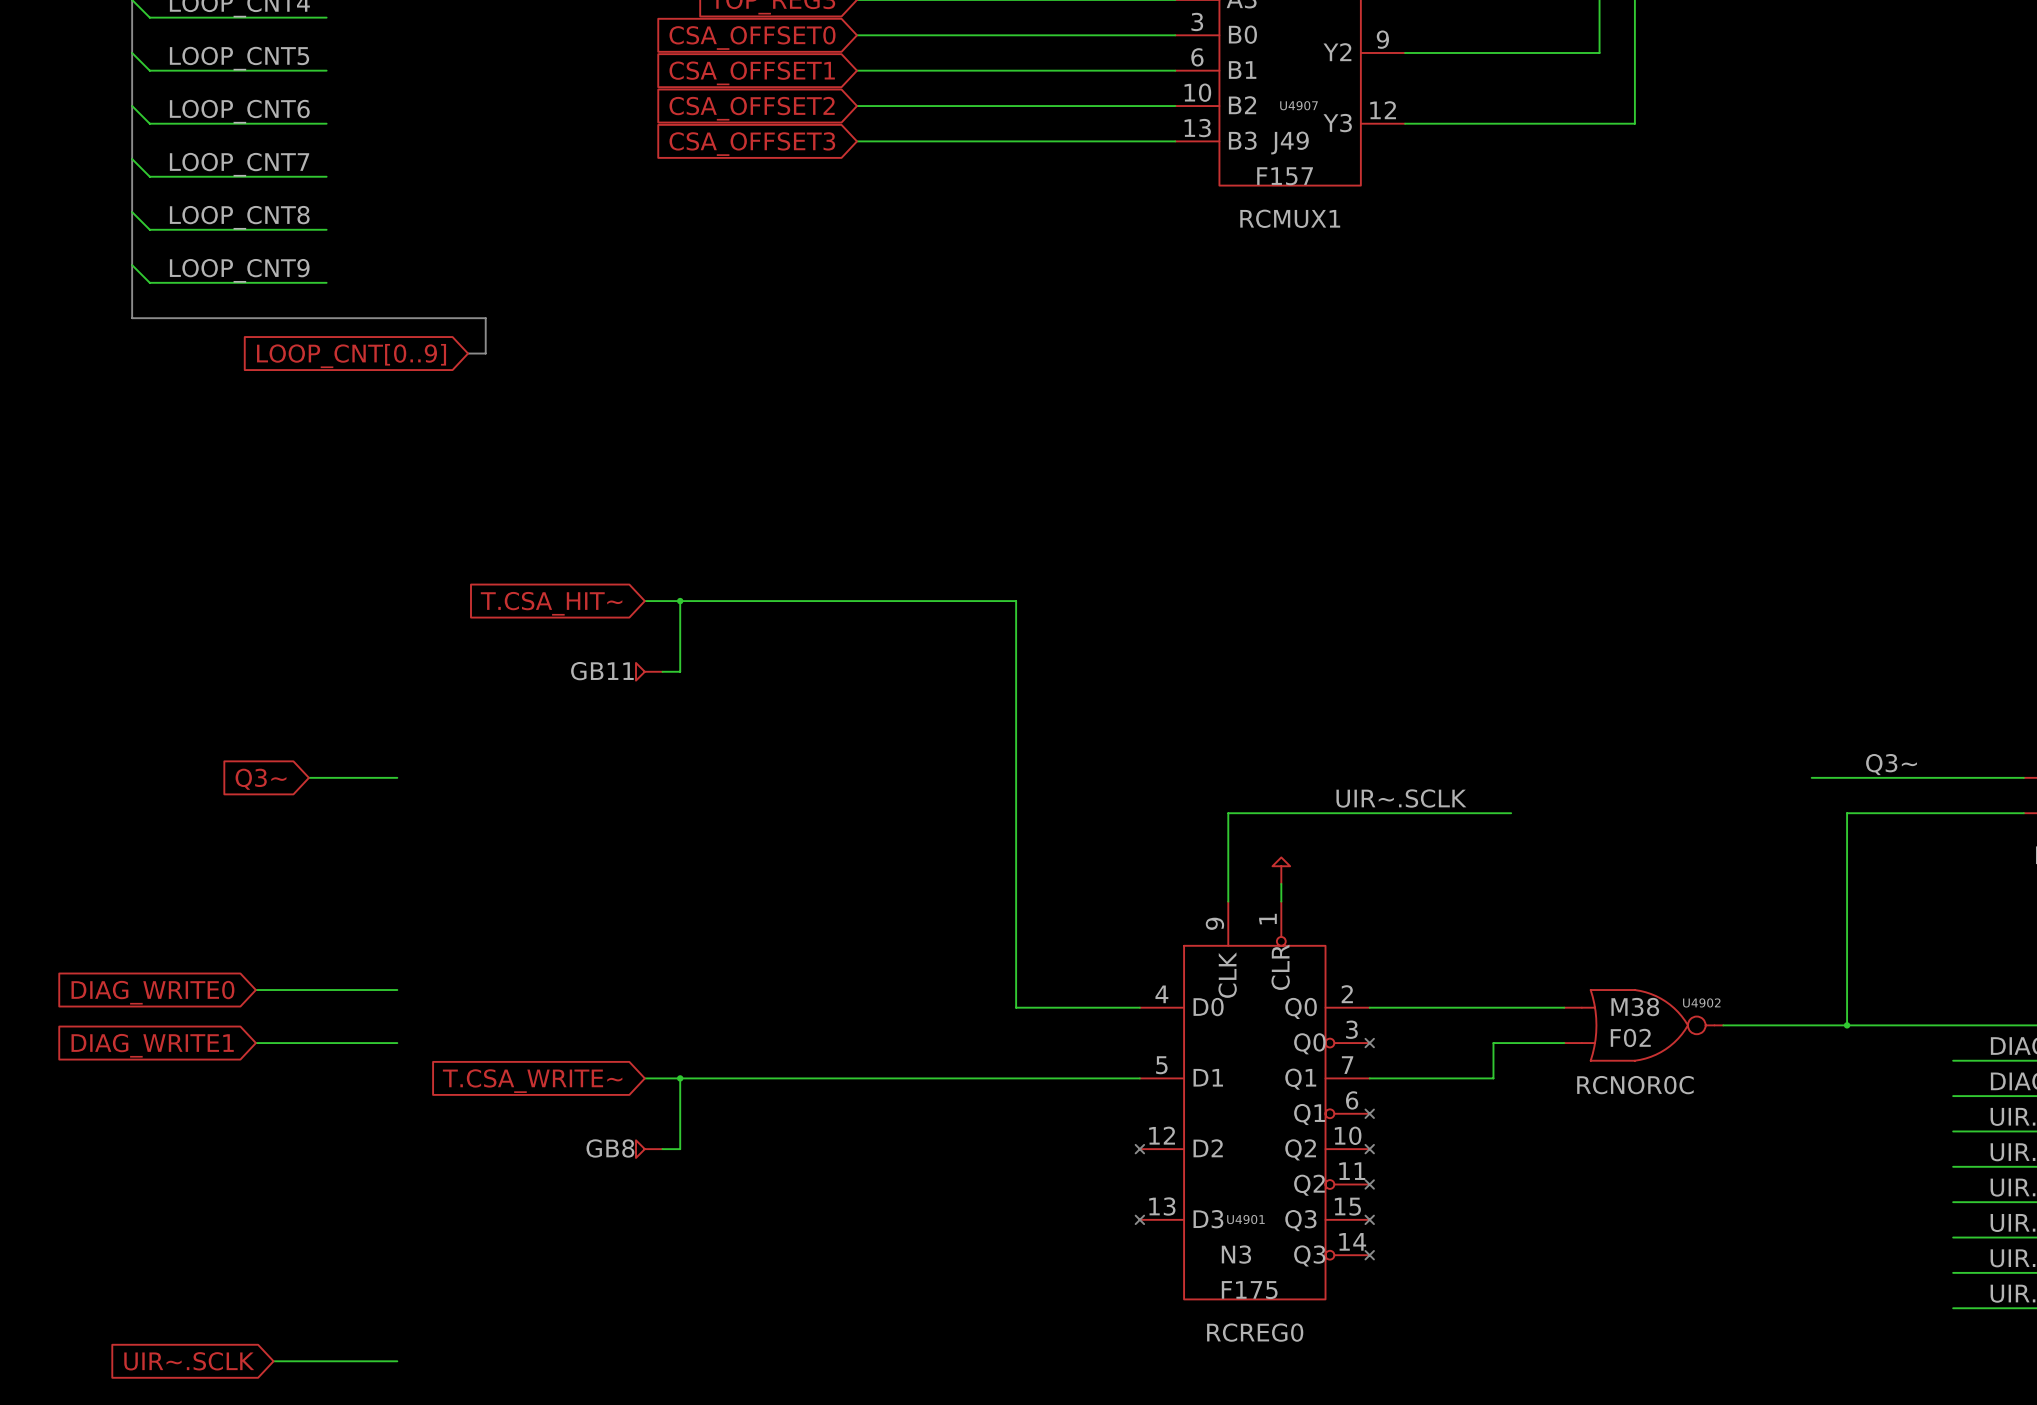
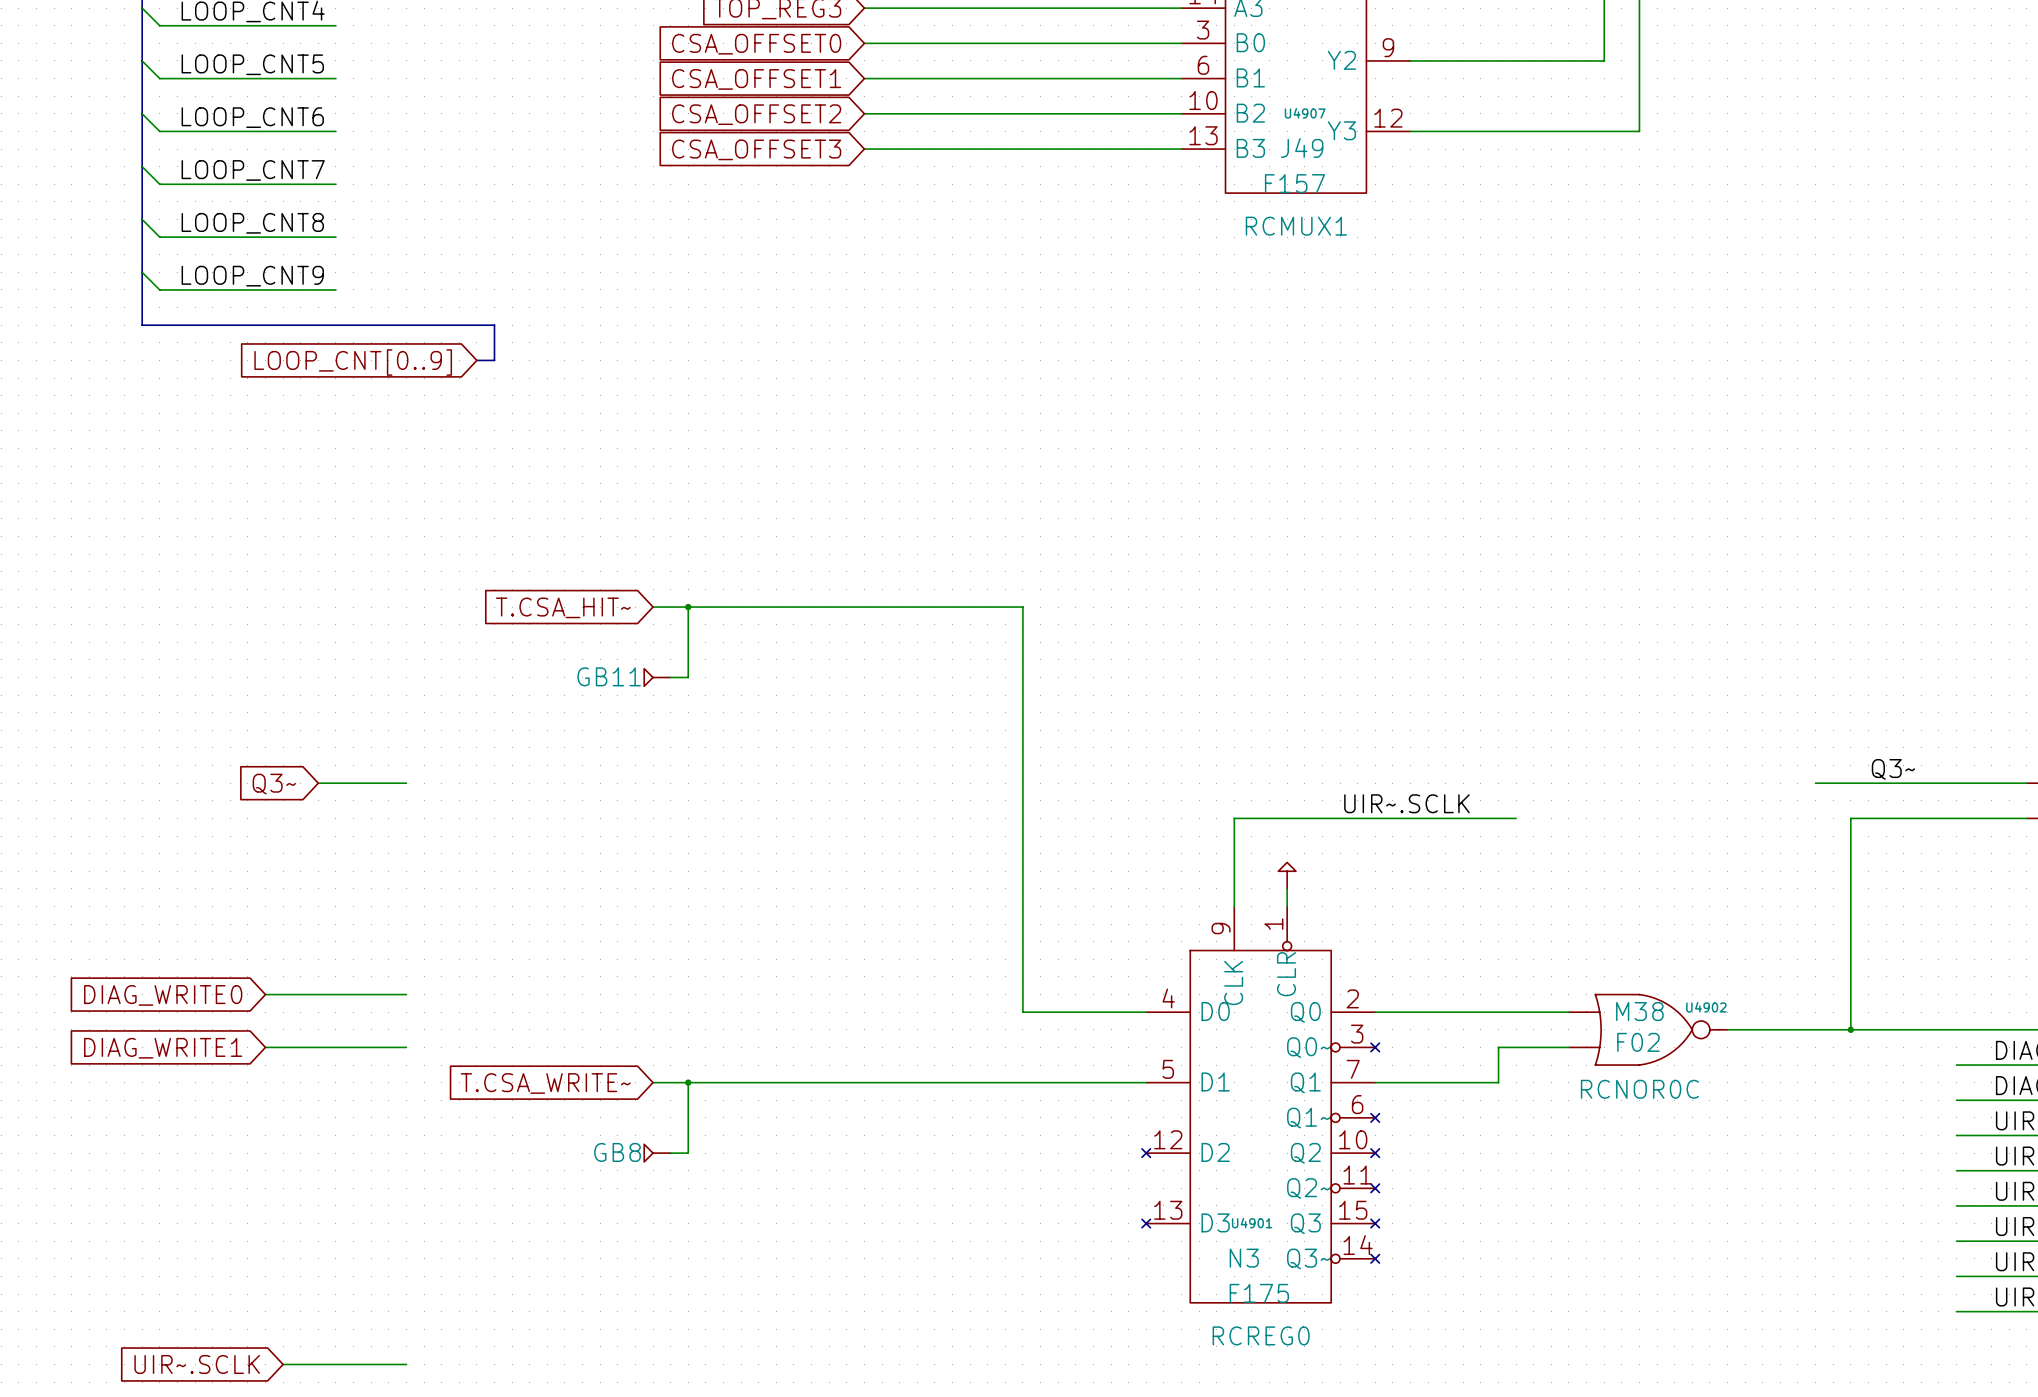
U4901 pin name: Q0 (1309, 1043) -> Q0~ (1308, 1047)
U4901 pin name: Q1 (1309, 1114) -> Q1~ (1308, 1118)
U4901 pin name: Q2 (1309, 1185) -> Q2~ (1308, 1188)
U4901 pin name: Q3 (1309, 1255) -> Q3~ (1308, 1258)

